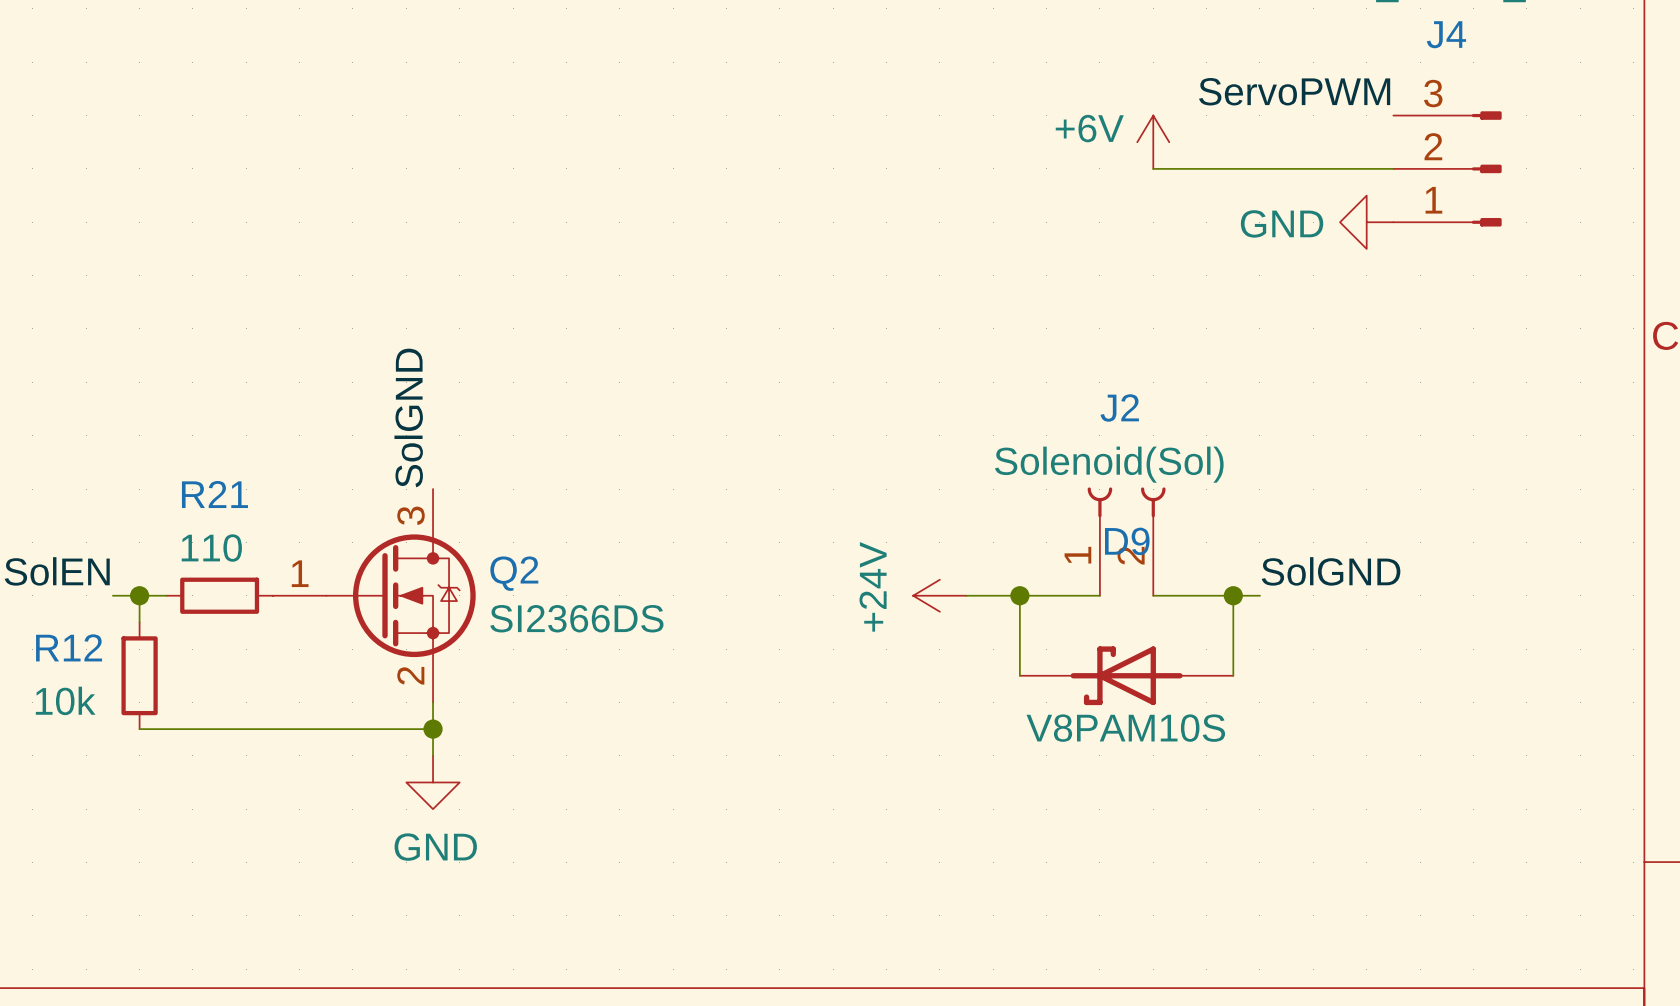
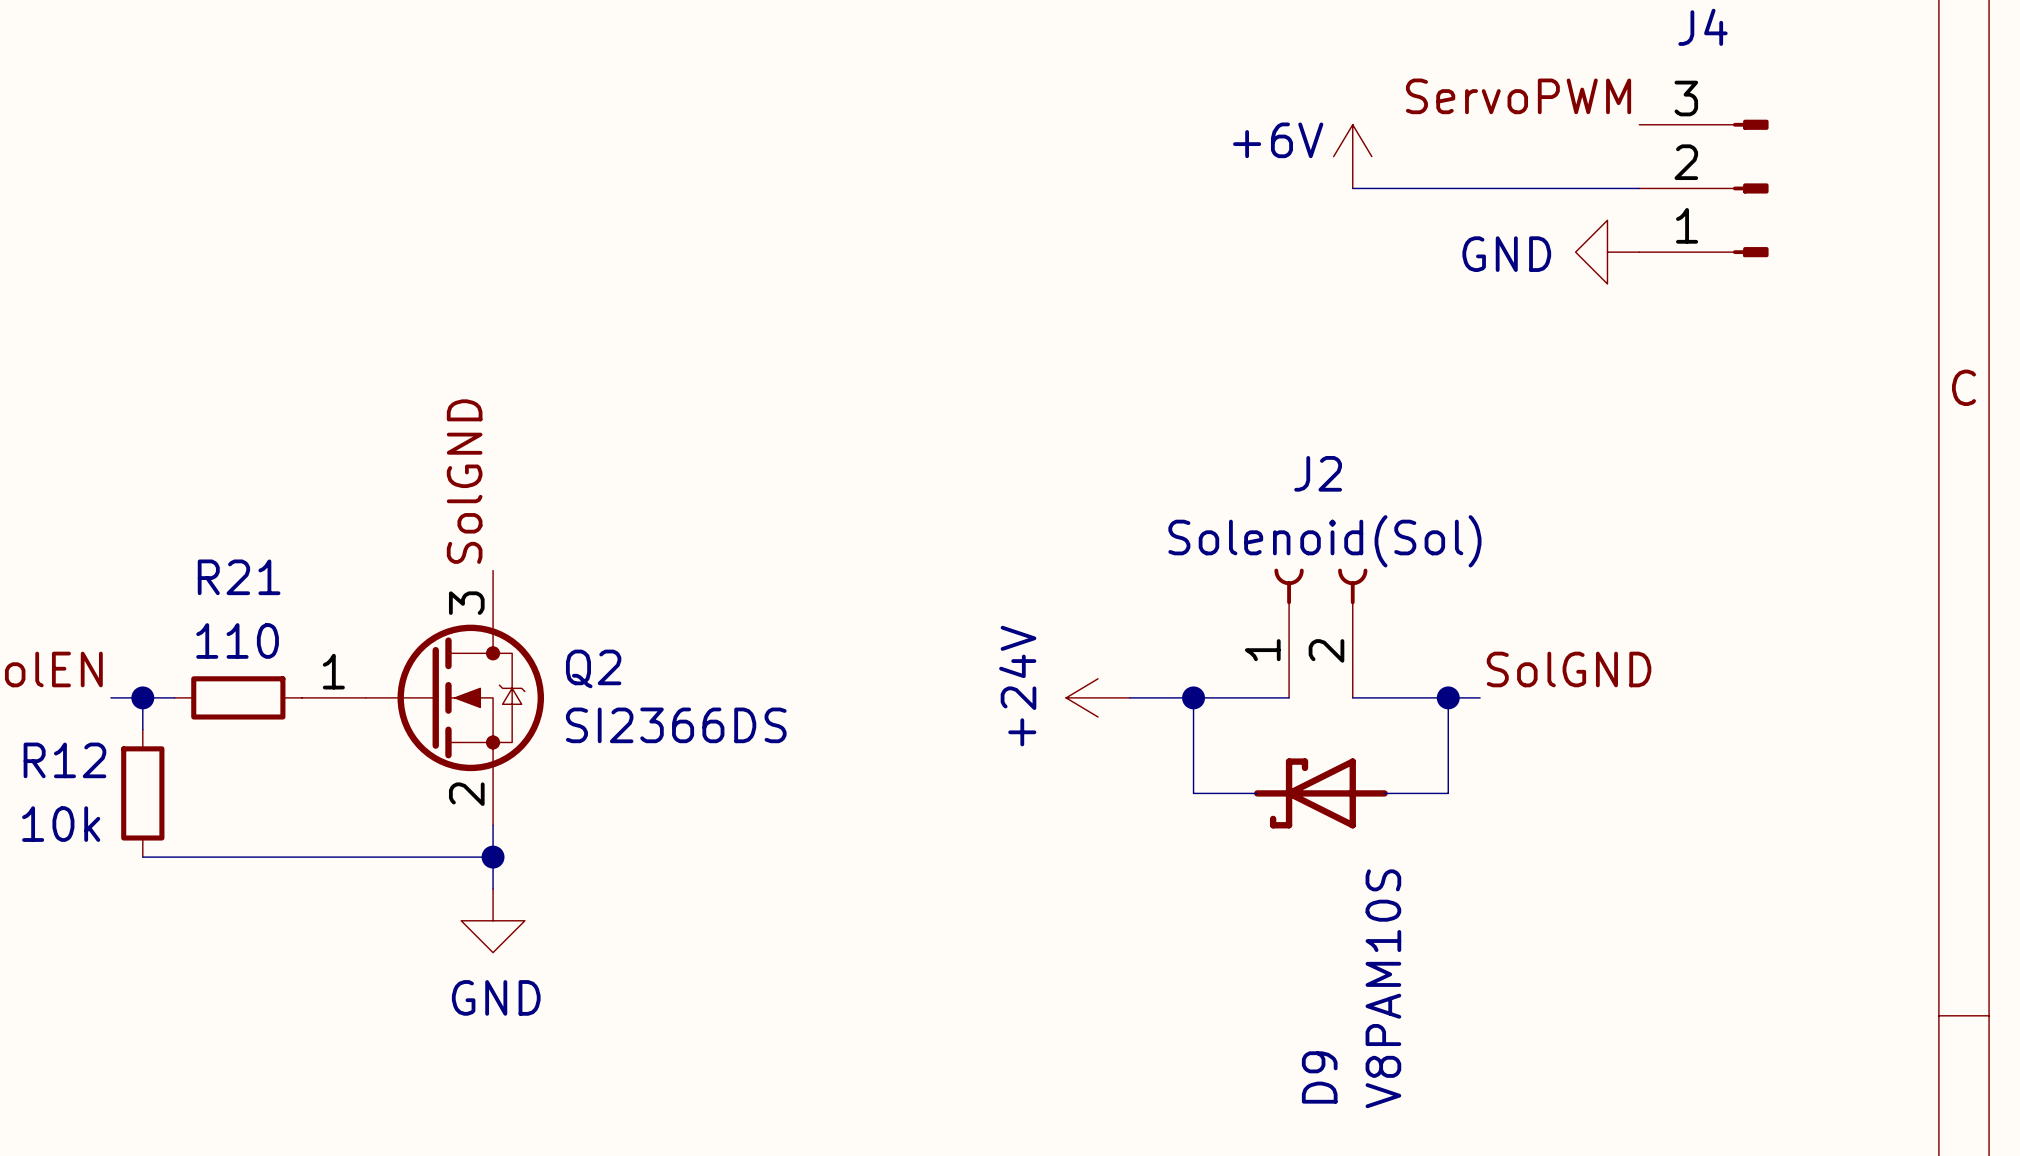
D9 name position: D9 (1127, 541) -> D9 (1319, 1077)
D9 symbol: [1019, 646, 1234, 706] -> [1254, 758, 1388, 829]
D9 value position: V8PAM10S (1125, 728) -> V8PAM10S (1383, 988)

